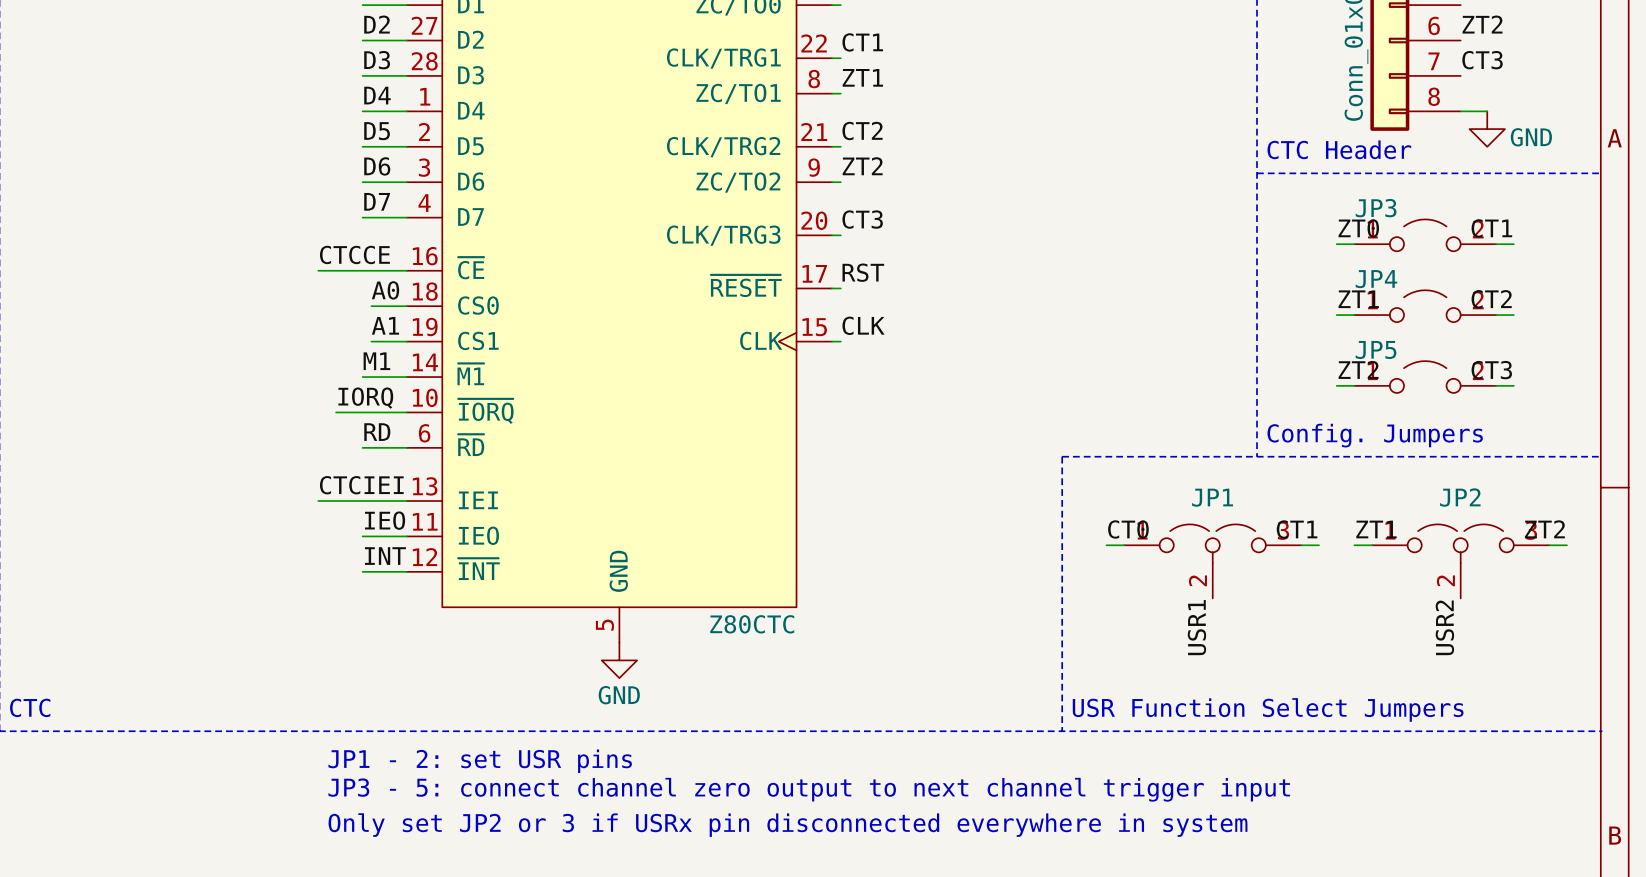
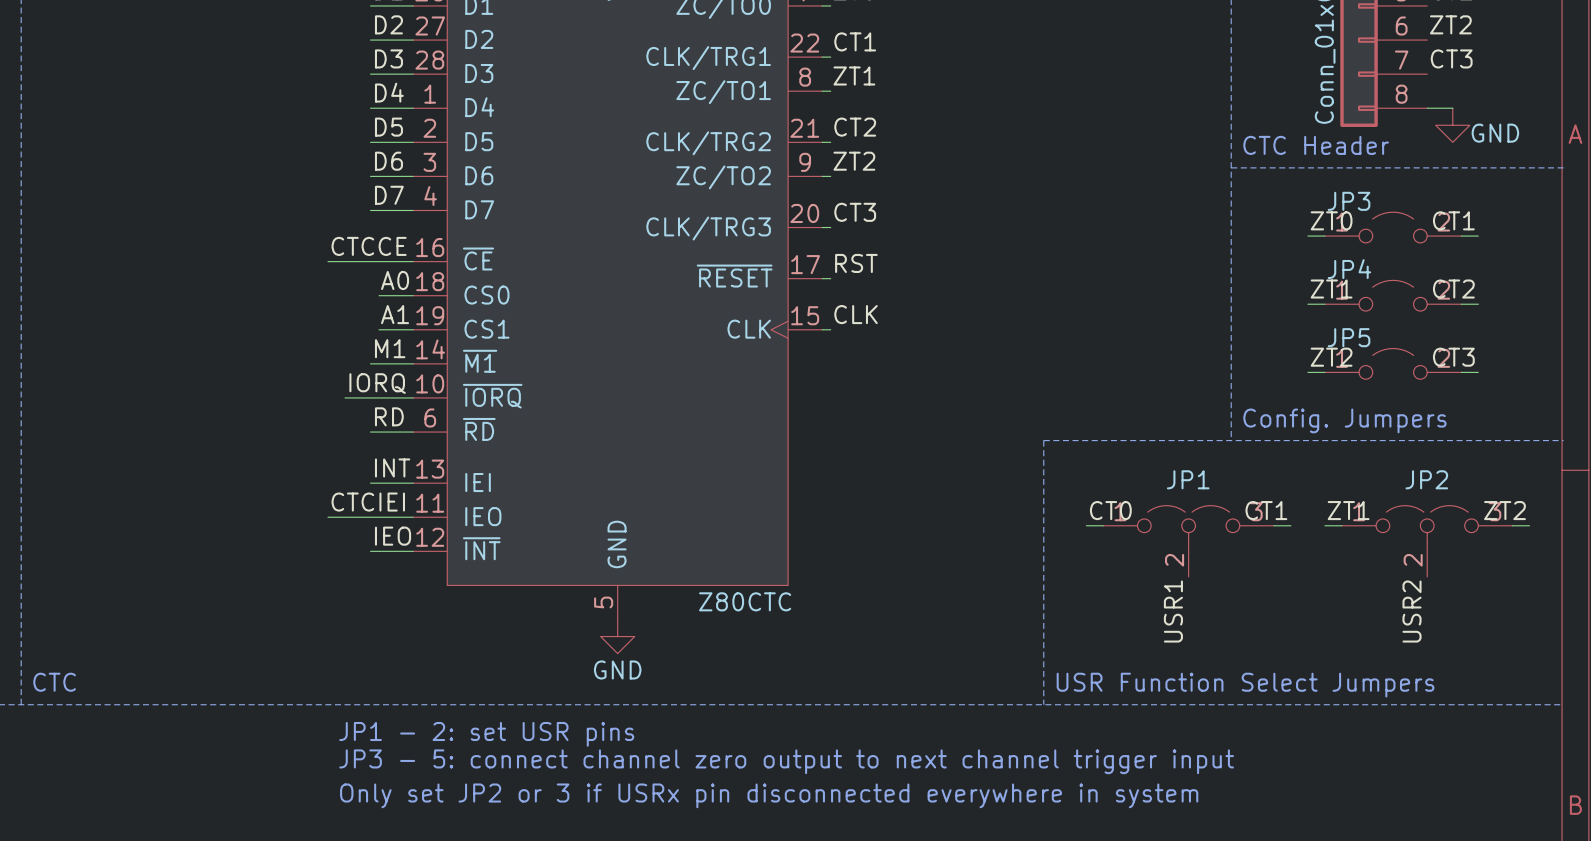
label position: CTCIEI (361, 485) -> CTCIEI (368, 502)
label: none -> INT (392, 467)
wire: (318, 501) (362, 501) -> (327, 517) (370, 517)
label: IEO (385, 520) -> none
label: INT (385, 556) -> IEO (393, 536)

